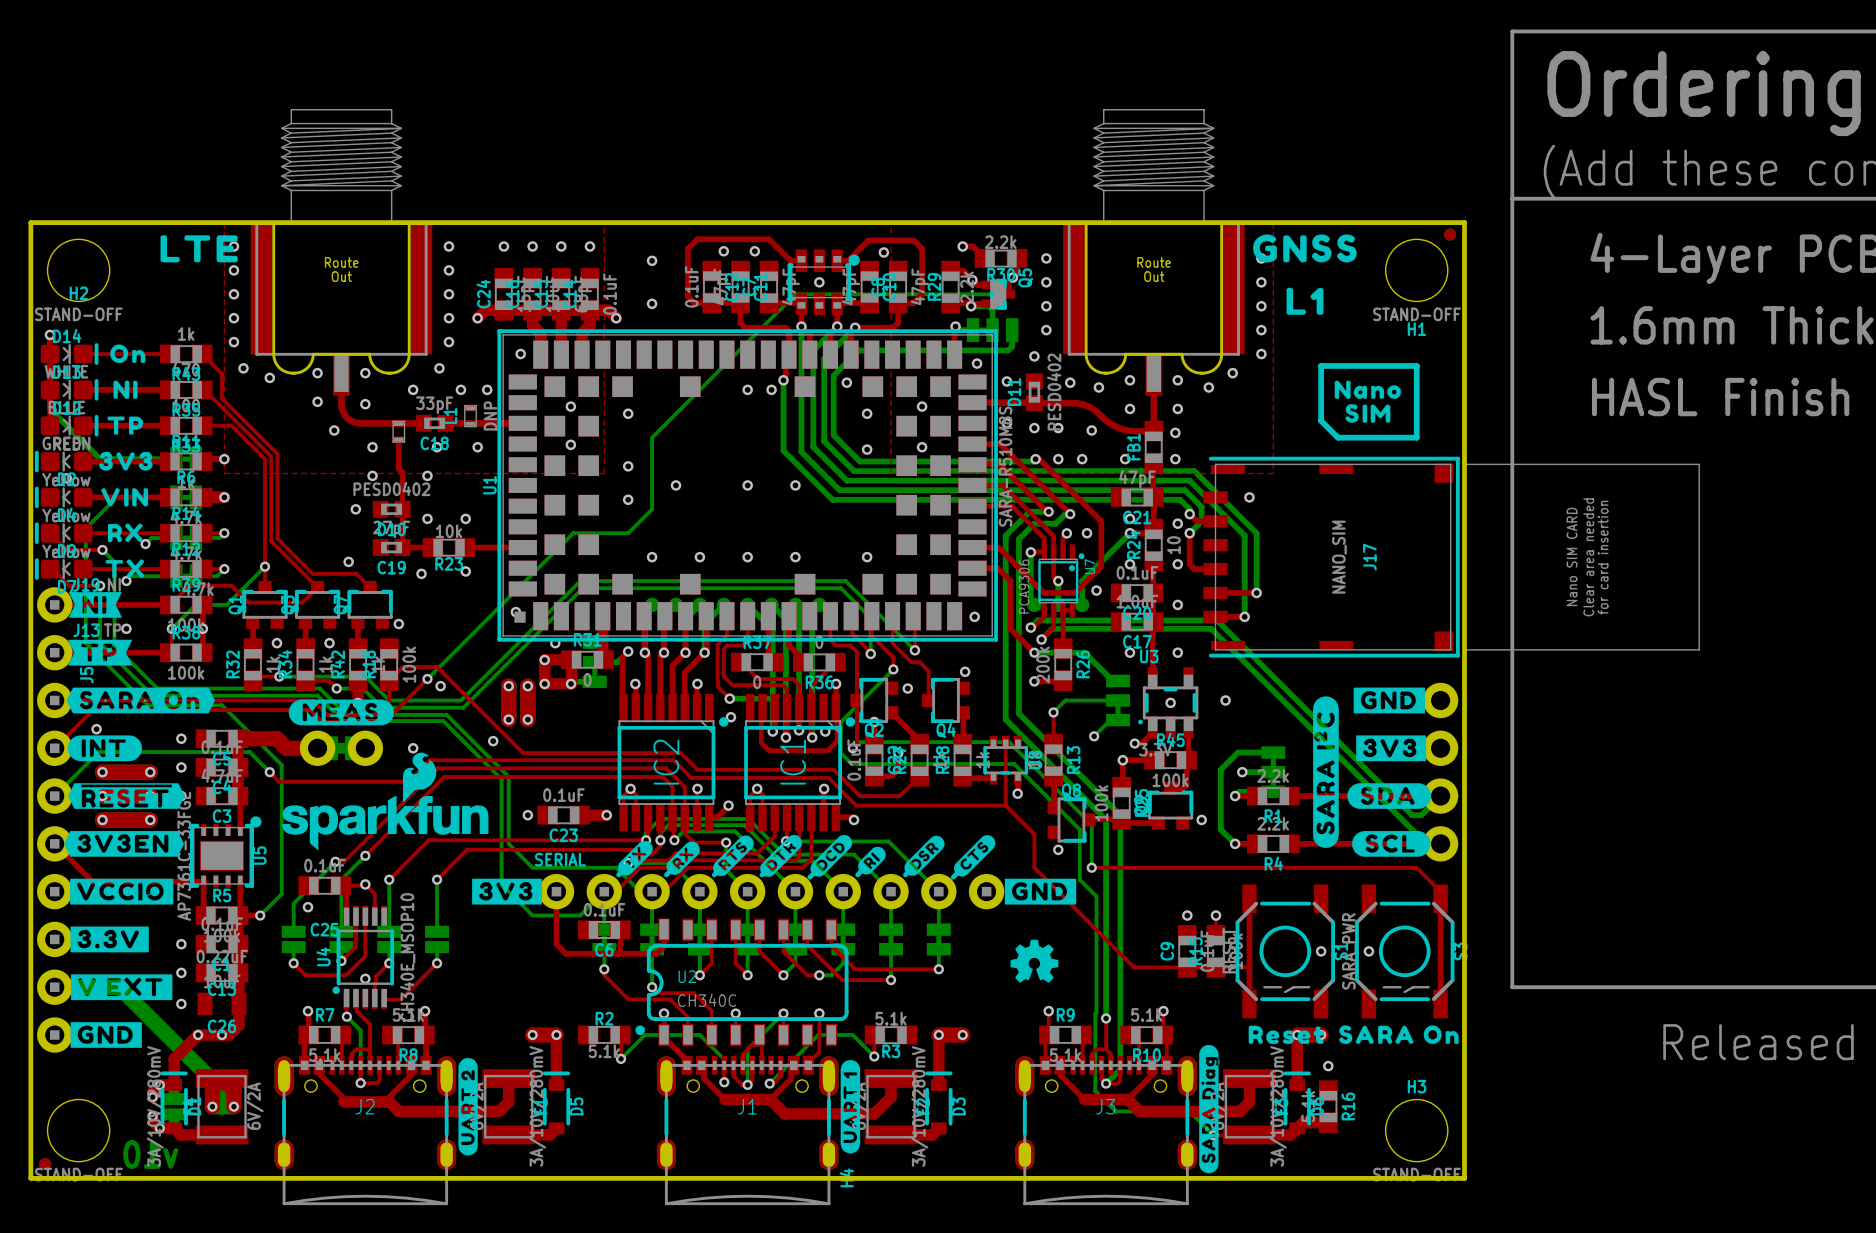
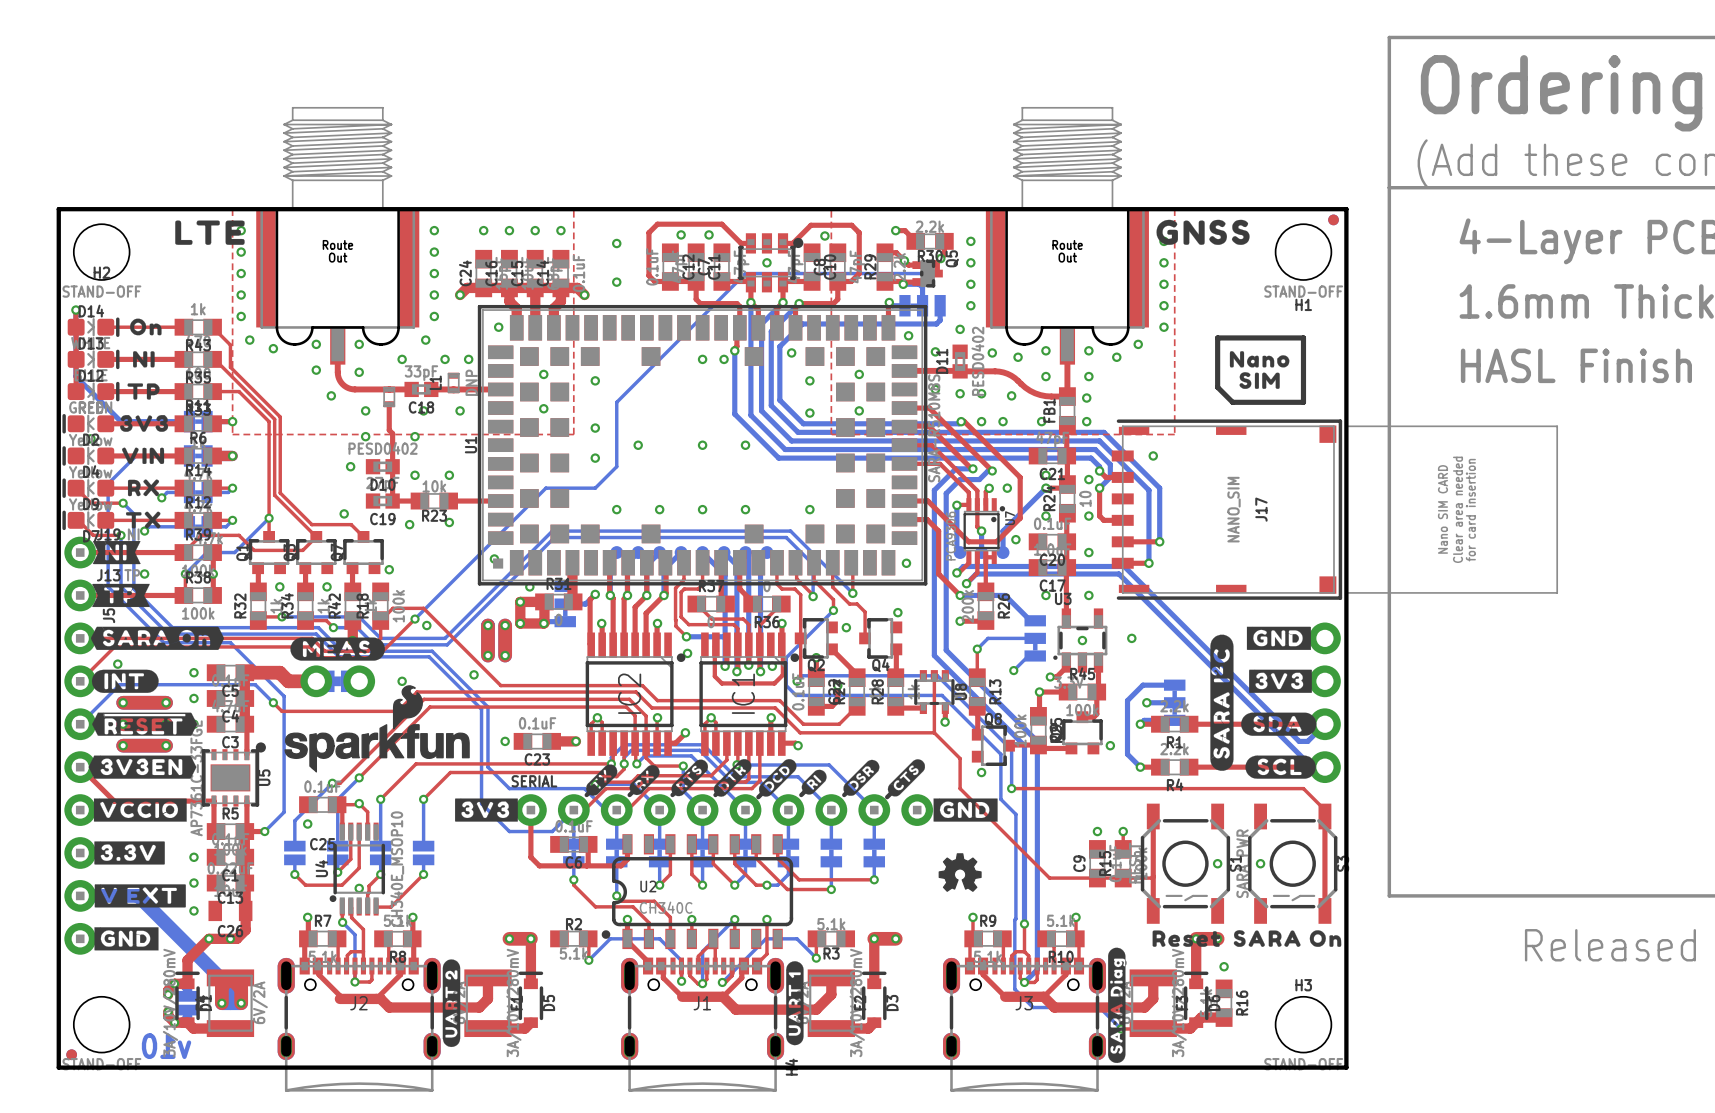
drawing: [1286, 287, 1324, 315] -> none

